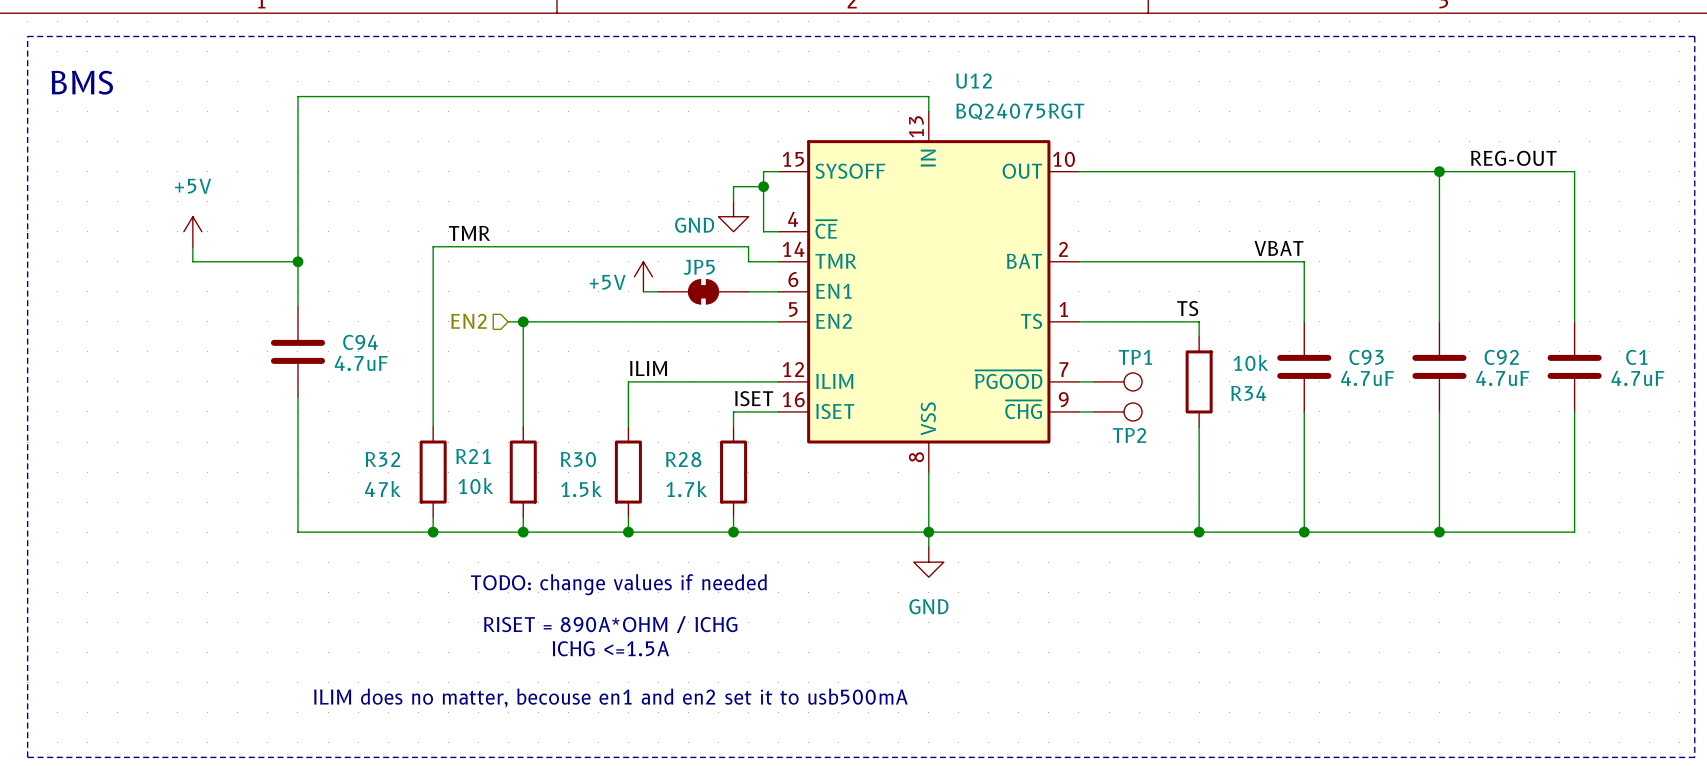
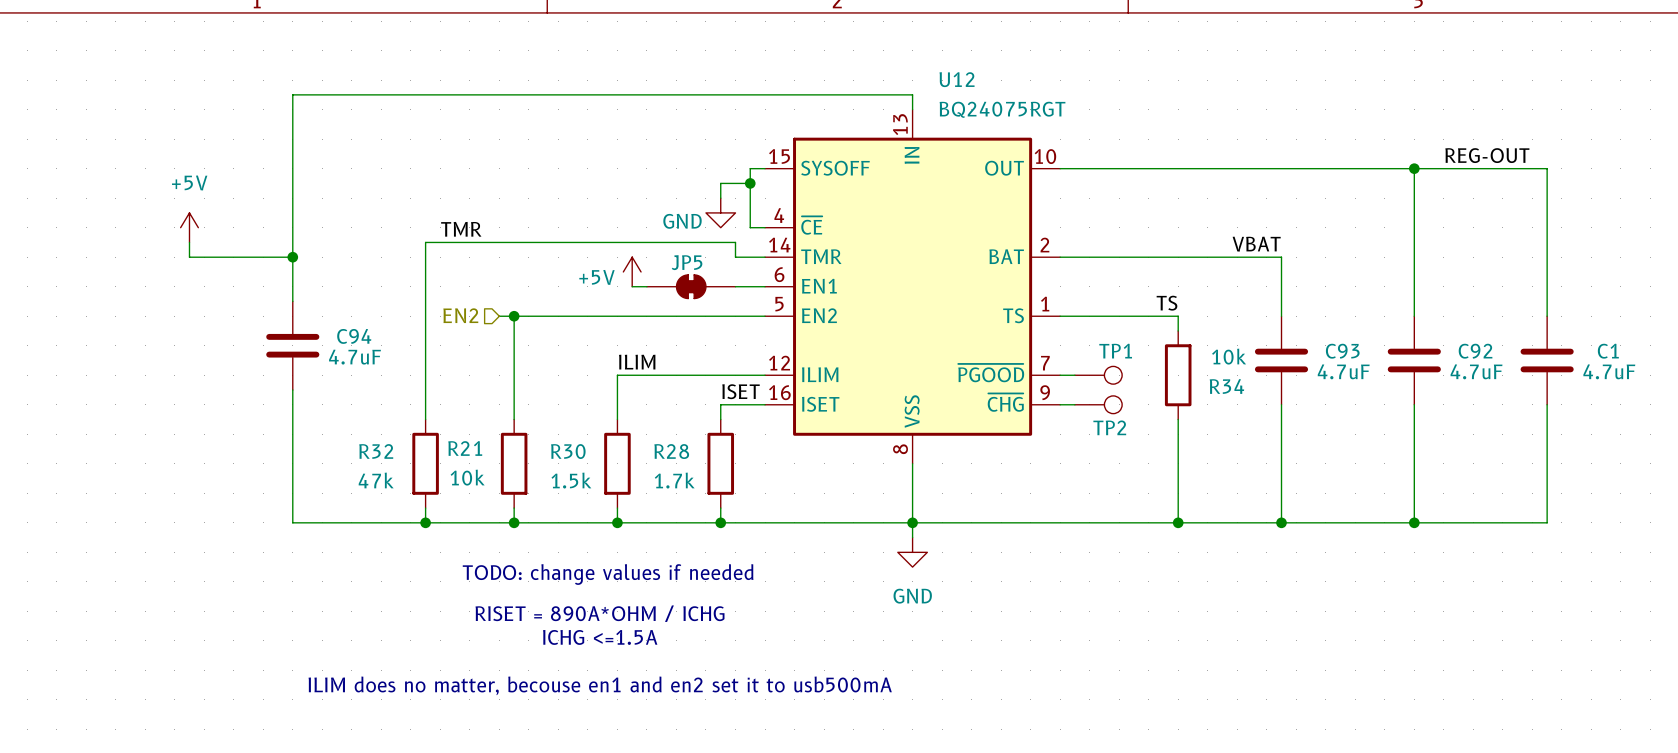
line: (27, 36) (1694, 36) (1694, 757) (27, 757) (27, 36) -> none
text: BMS (82, 82) -> none

